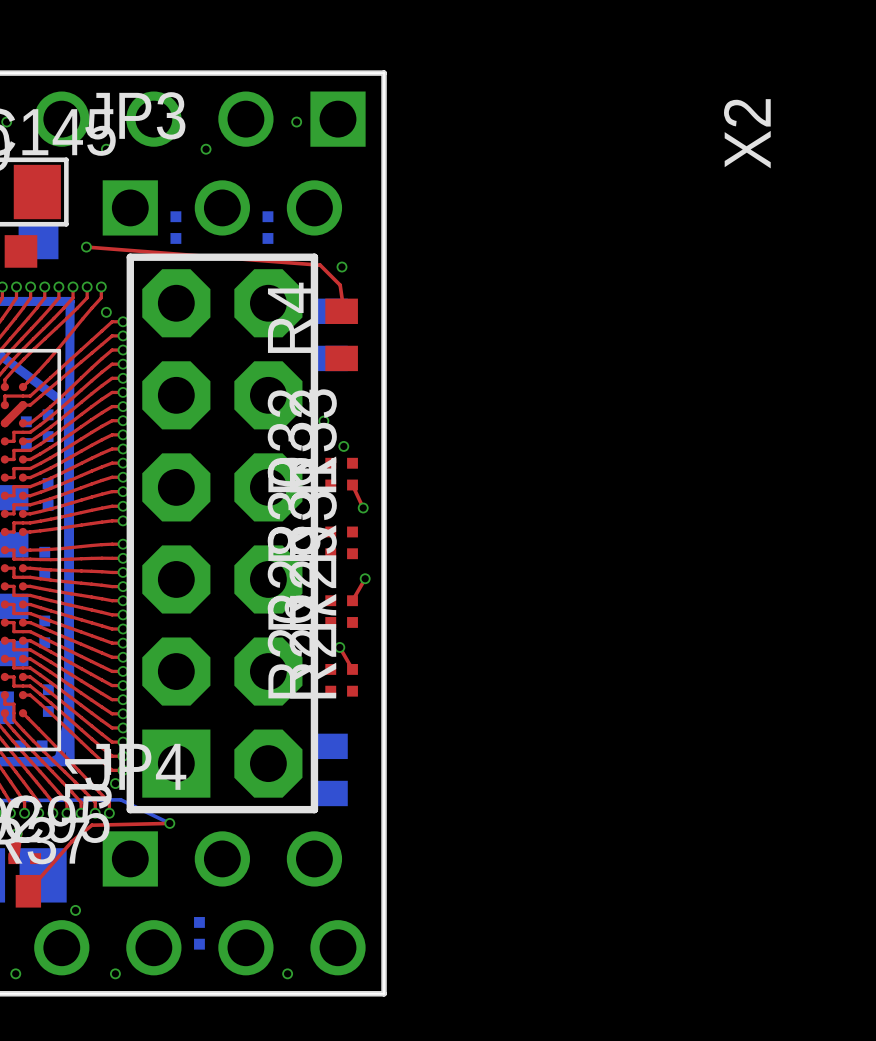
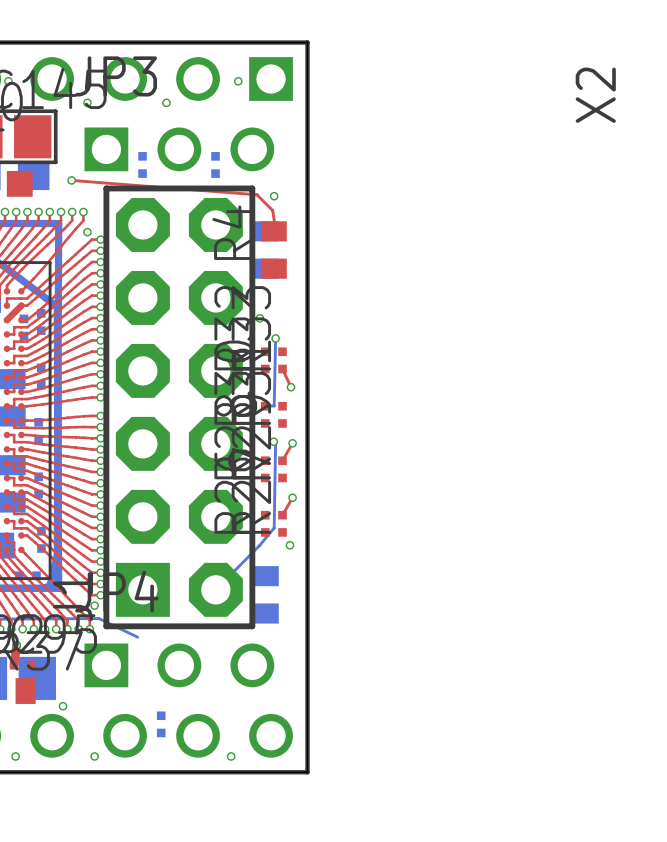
bottom track: none -> (275, 338) (274, 405) (265, 406)
bottom track: none -> (273, 441) (275, 441) (274, 528) (215, 589)
via: none -> (273, 441)
top track: (339, 647) (352, 669) -> (292, 497) (282, 515)
via position: (339, 647) -> (292, 497)
via: none -> (289, 545)
top track: (169, 823) (91, 825) (71, 841) (28, 891) -> none
via: (169, 823) -> none

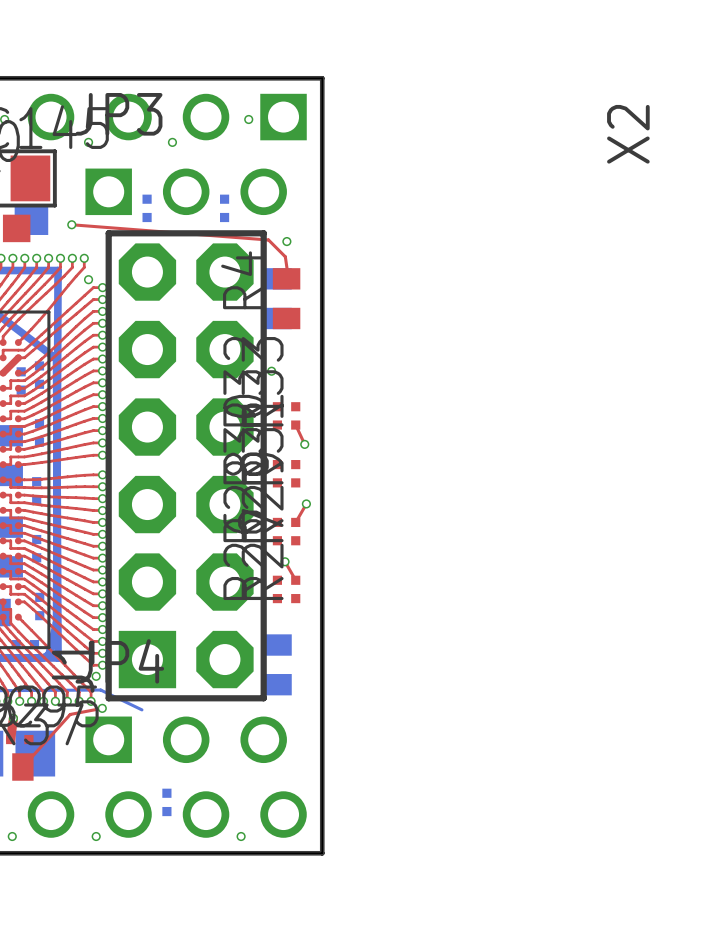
bottom track: (275, 338) (274, 405) (265, 406) -> none
via: (275, 338) -> none
bottom track: (273, 441) (275, 441) (274, 528) (215, 589) -> none
via: (273, 441) -> none
top track: (292, 497) (282, 515) -> (285, 561) (295, 580)
via position: (292, 497) -> (285, 561)
via: (289, 545) -> none
top track: none -> (102, 708) (70, 714) (22, 767)
via: none -> (102, 708)
via: (63, 706) -> none

